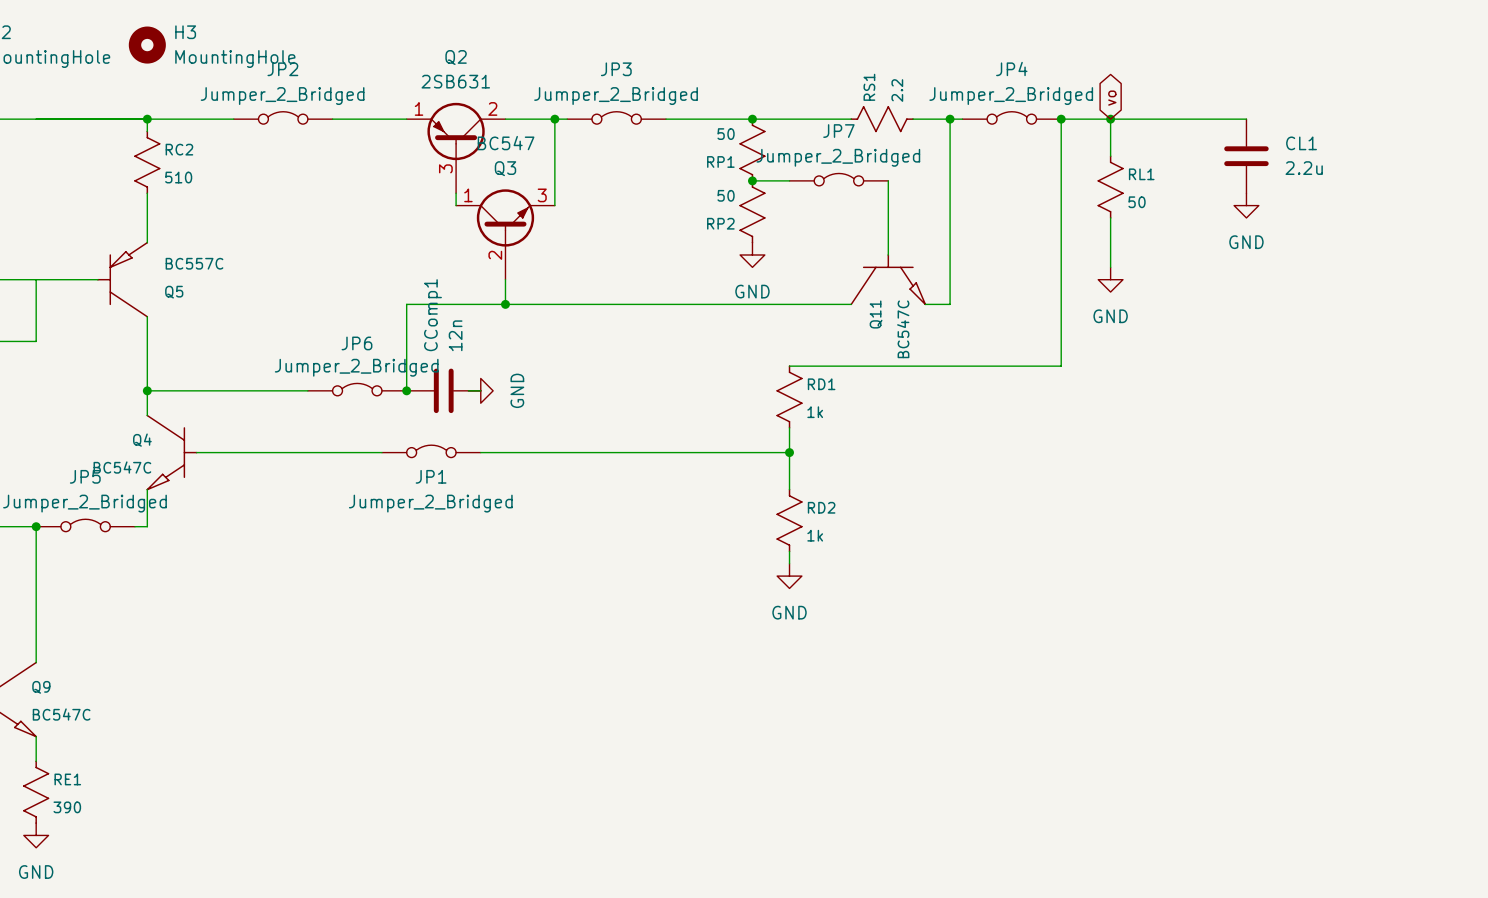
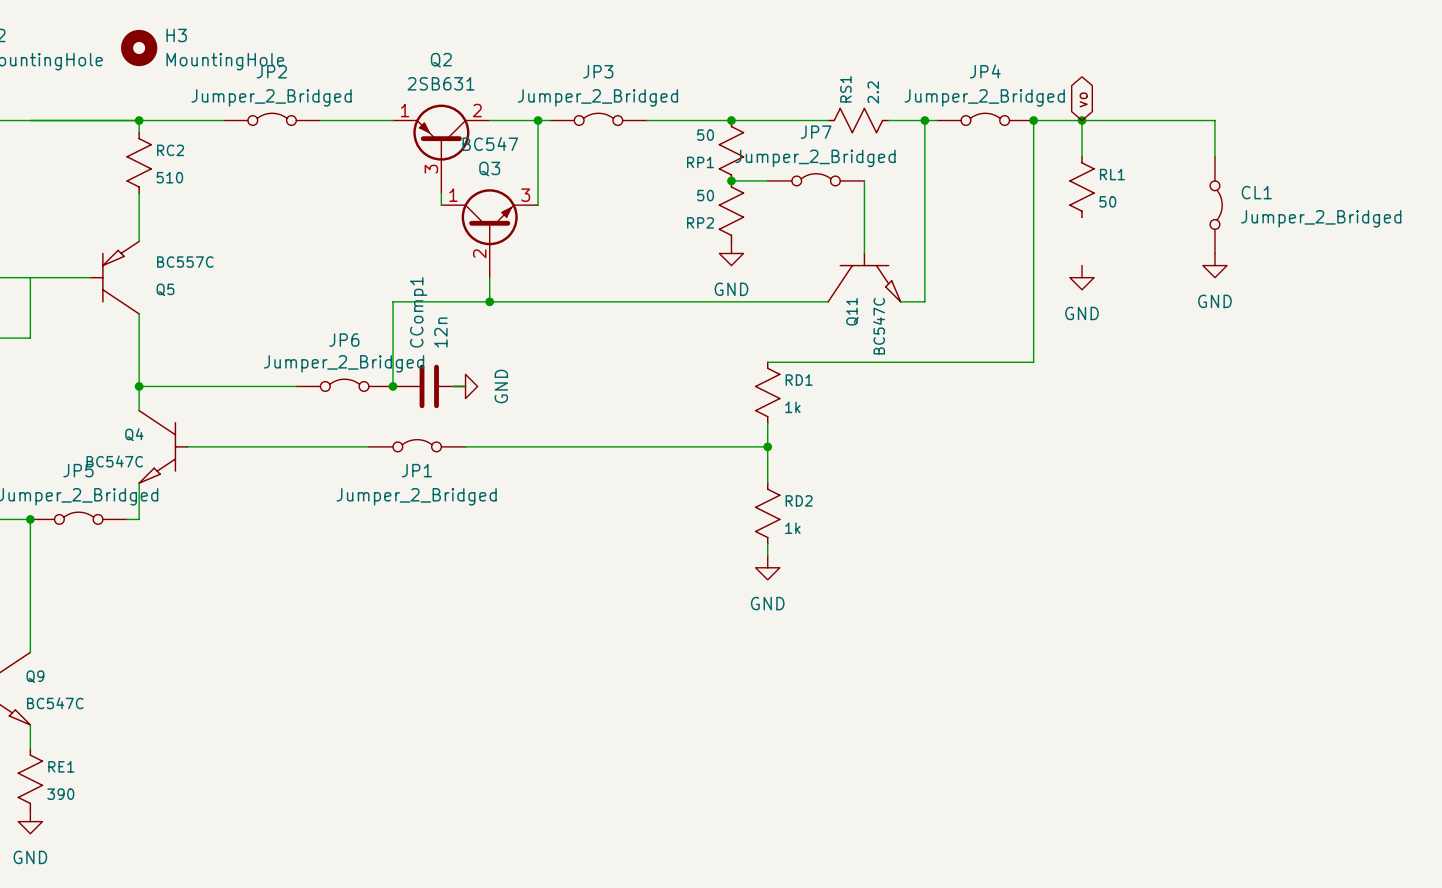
CL1 symbol: [1224, 119, 1269, 194] -> [1210, 156, 1223, 254]
CL1 value: 2.2u (1304, 168) -> Jumper_2_Bridged (1321, 218)
power symbol position: GND (1246, 205) -> GND (1214, 265)
wire: (1110, 217) (1110, 267) -> none

